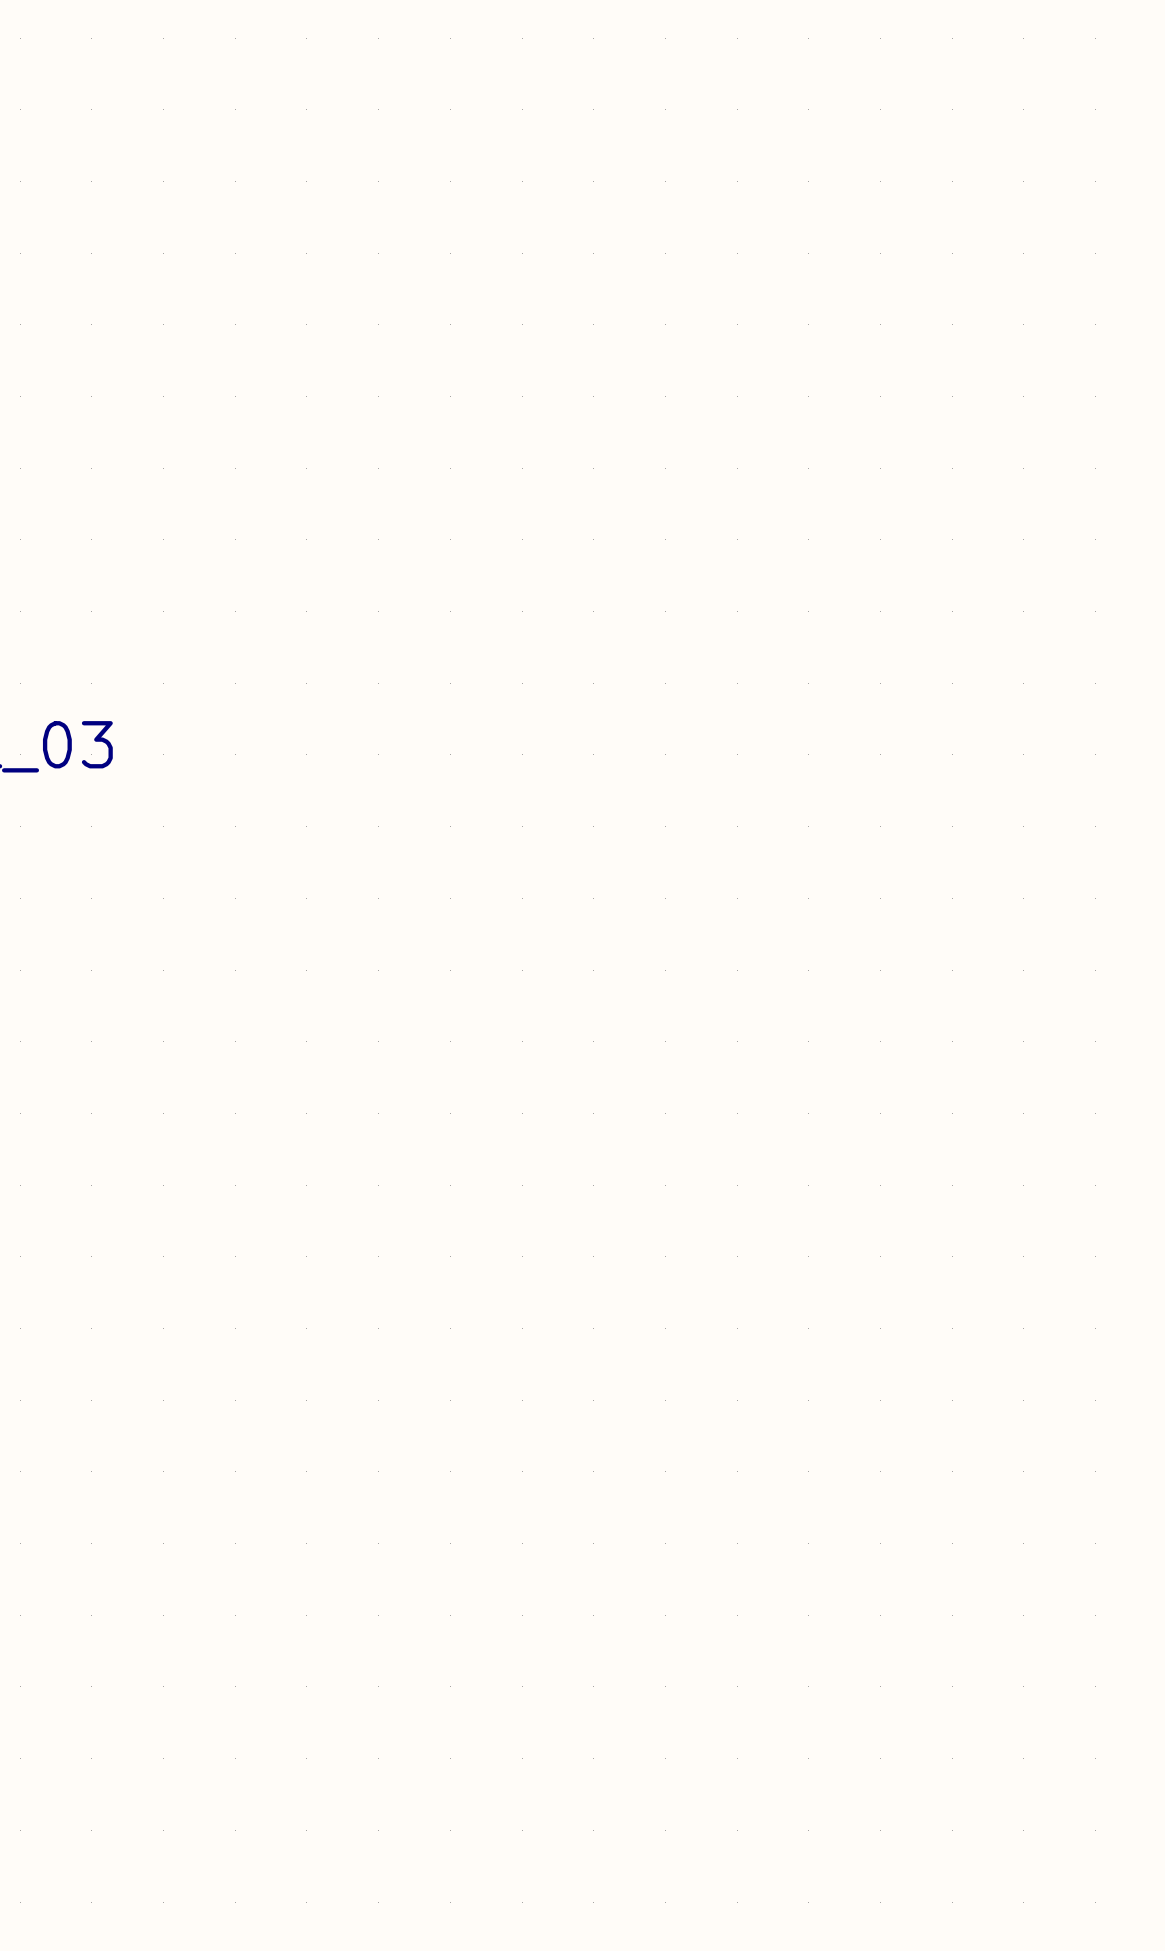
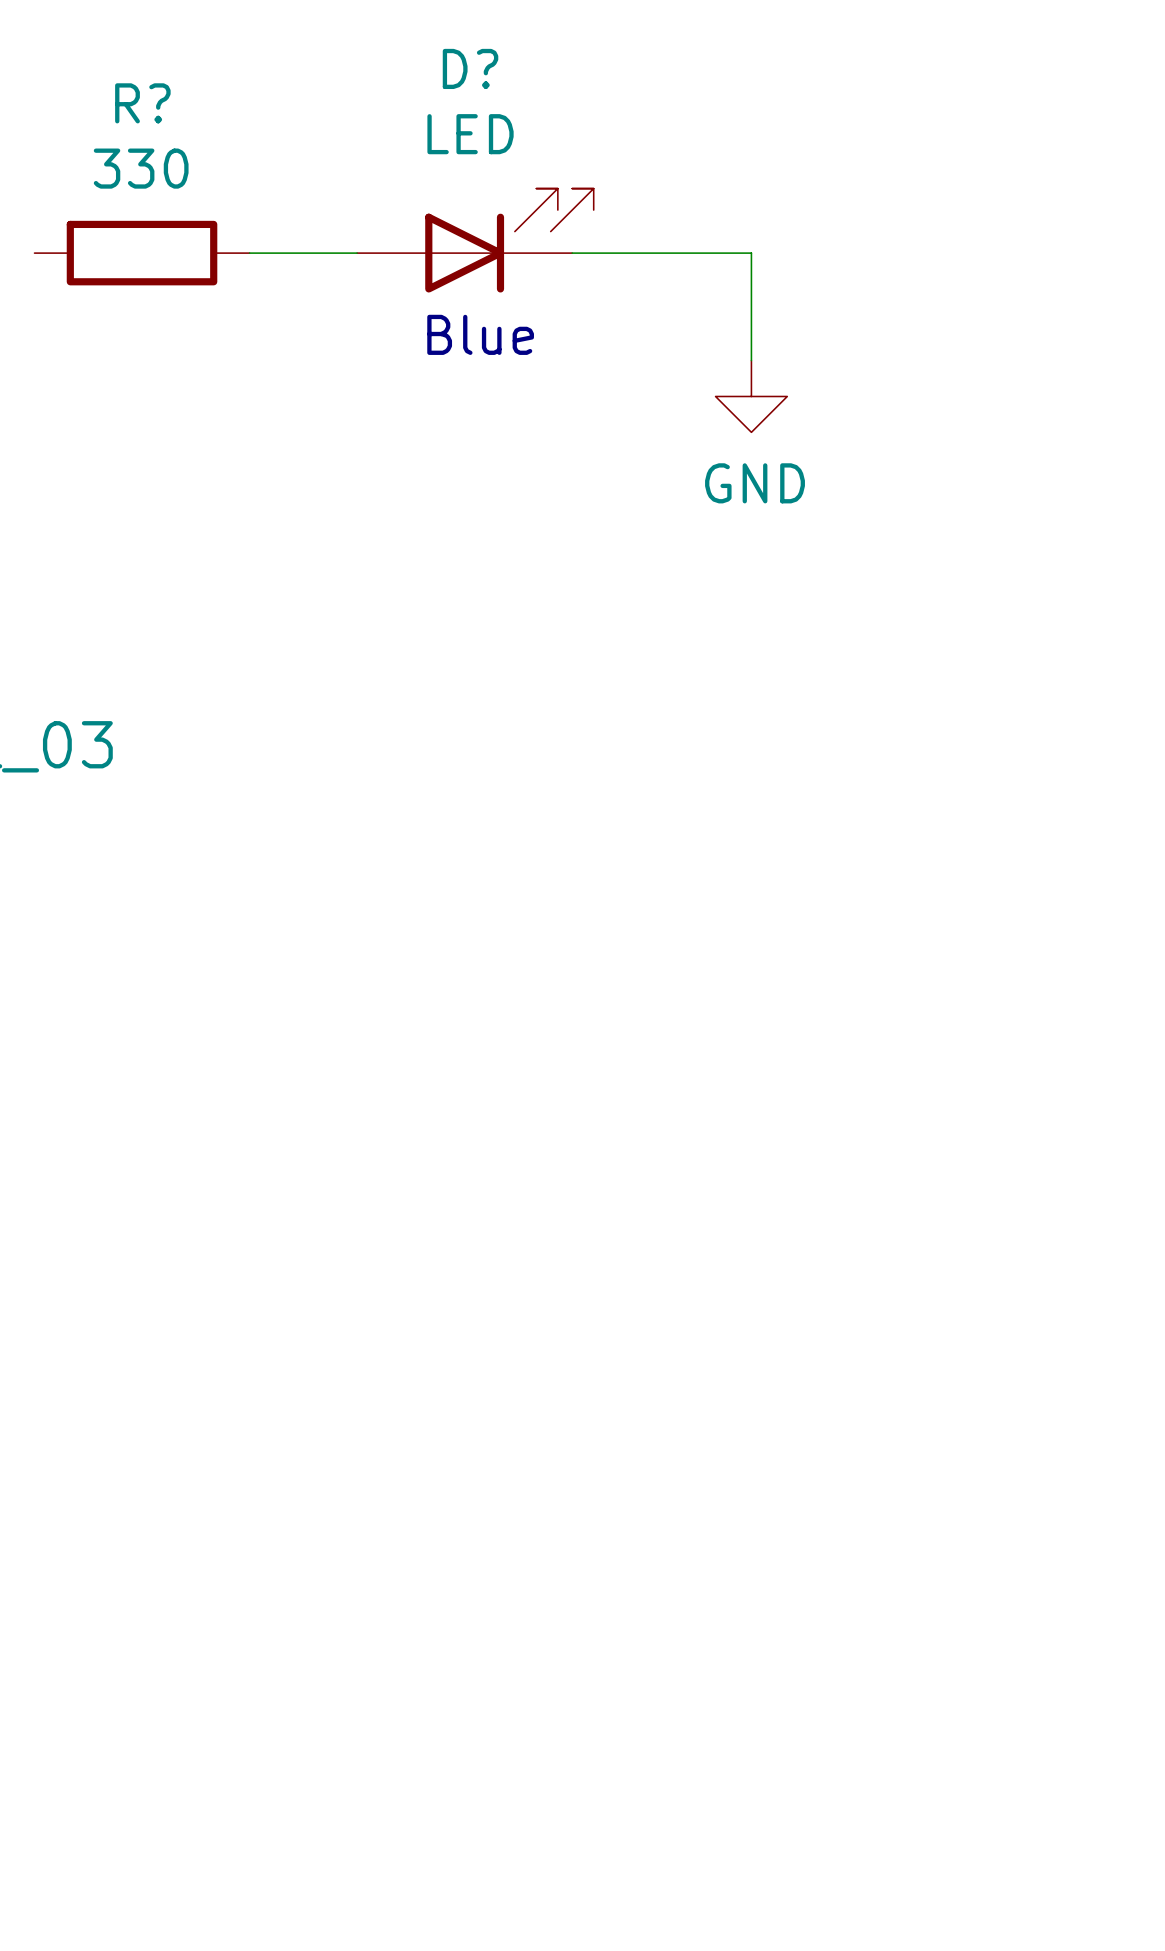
D?: none -> LED (475, 240)
R?: none -> 330 (142, 253)
wire: none -> (249, 253) (357, 253)
wire: none -> (572, 253) (751, 253) (751, 360)
text: none -> Blue (480, 334)
power symbol: none -> GND (751, 396)

